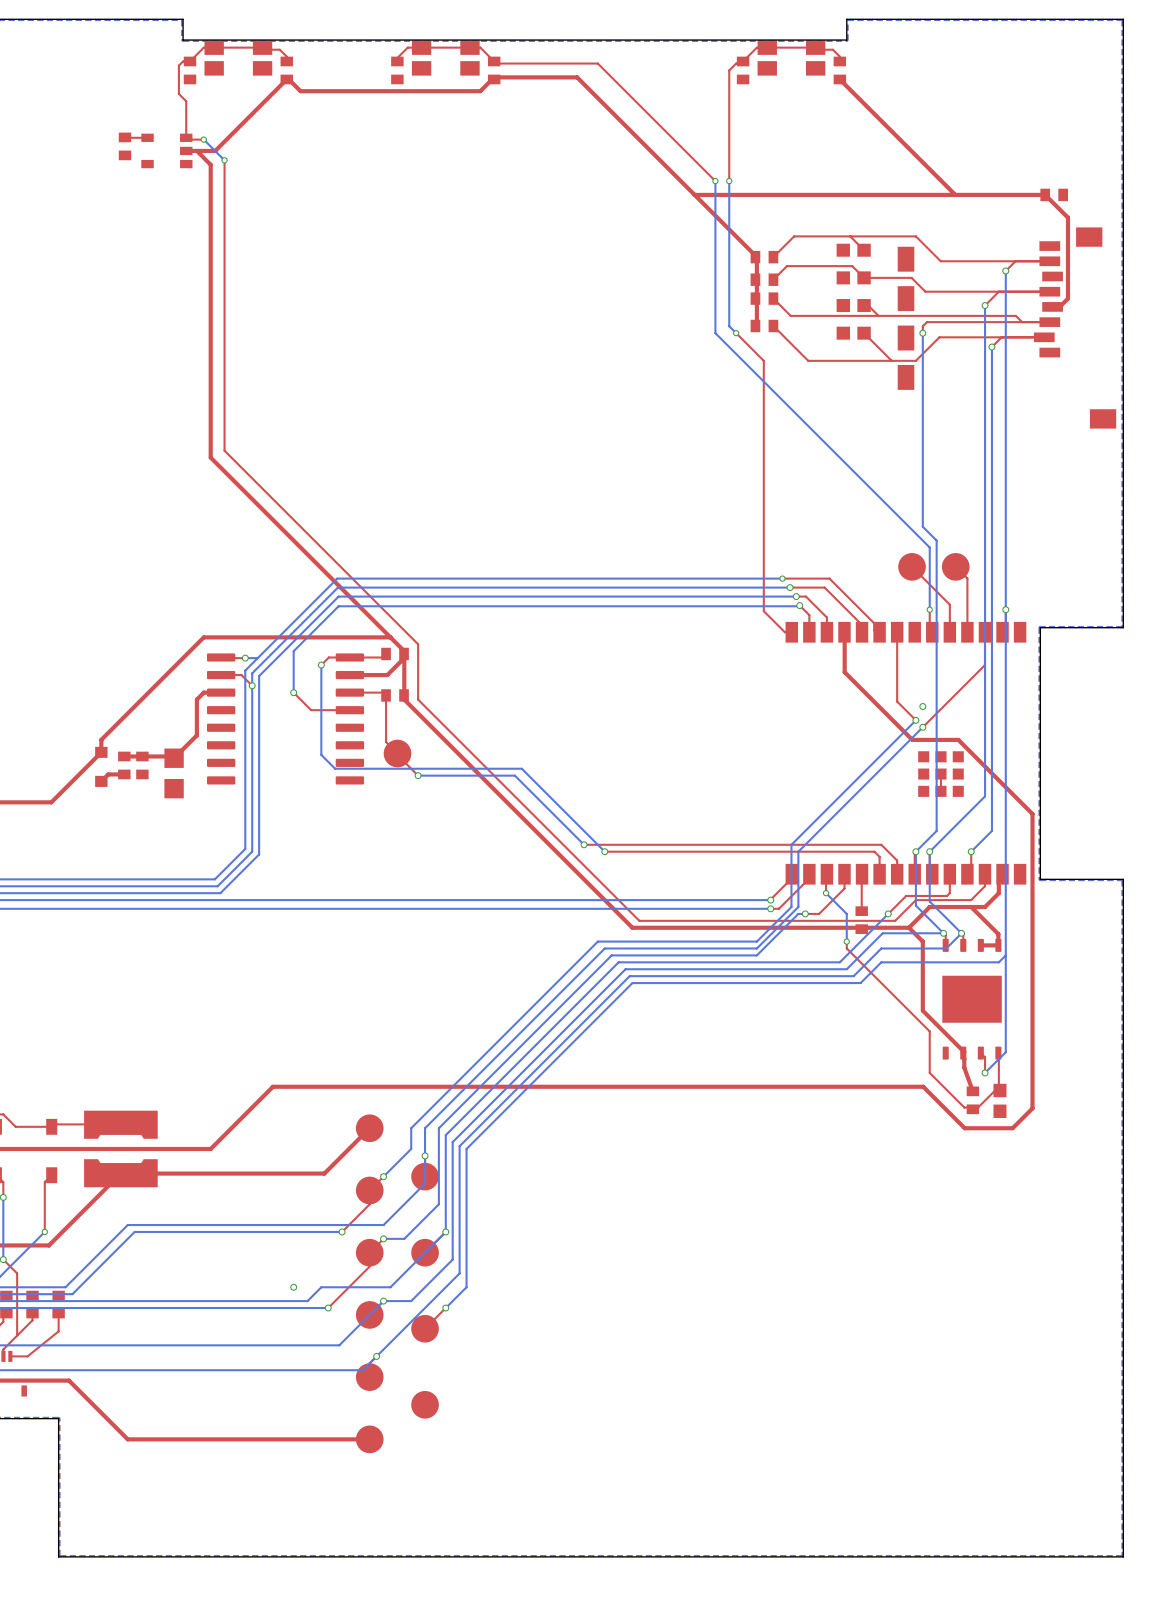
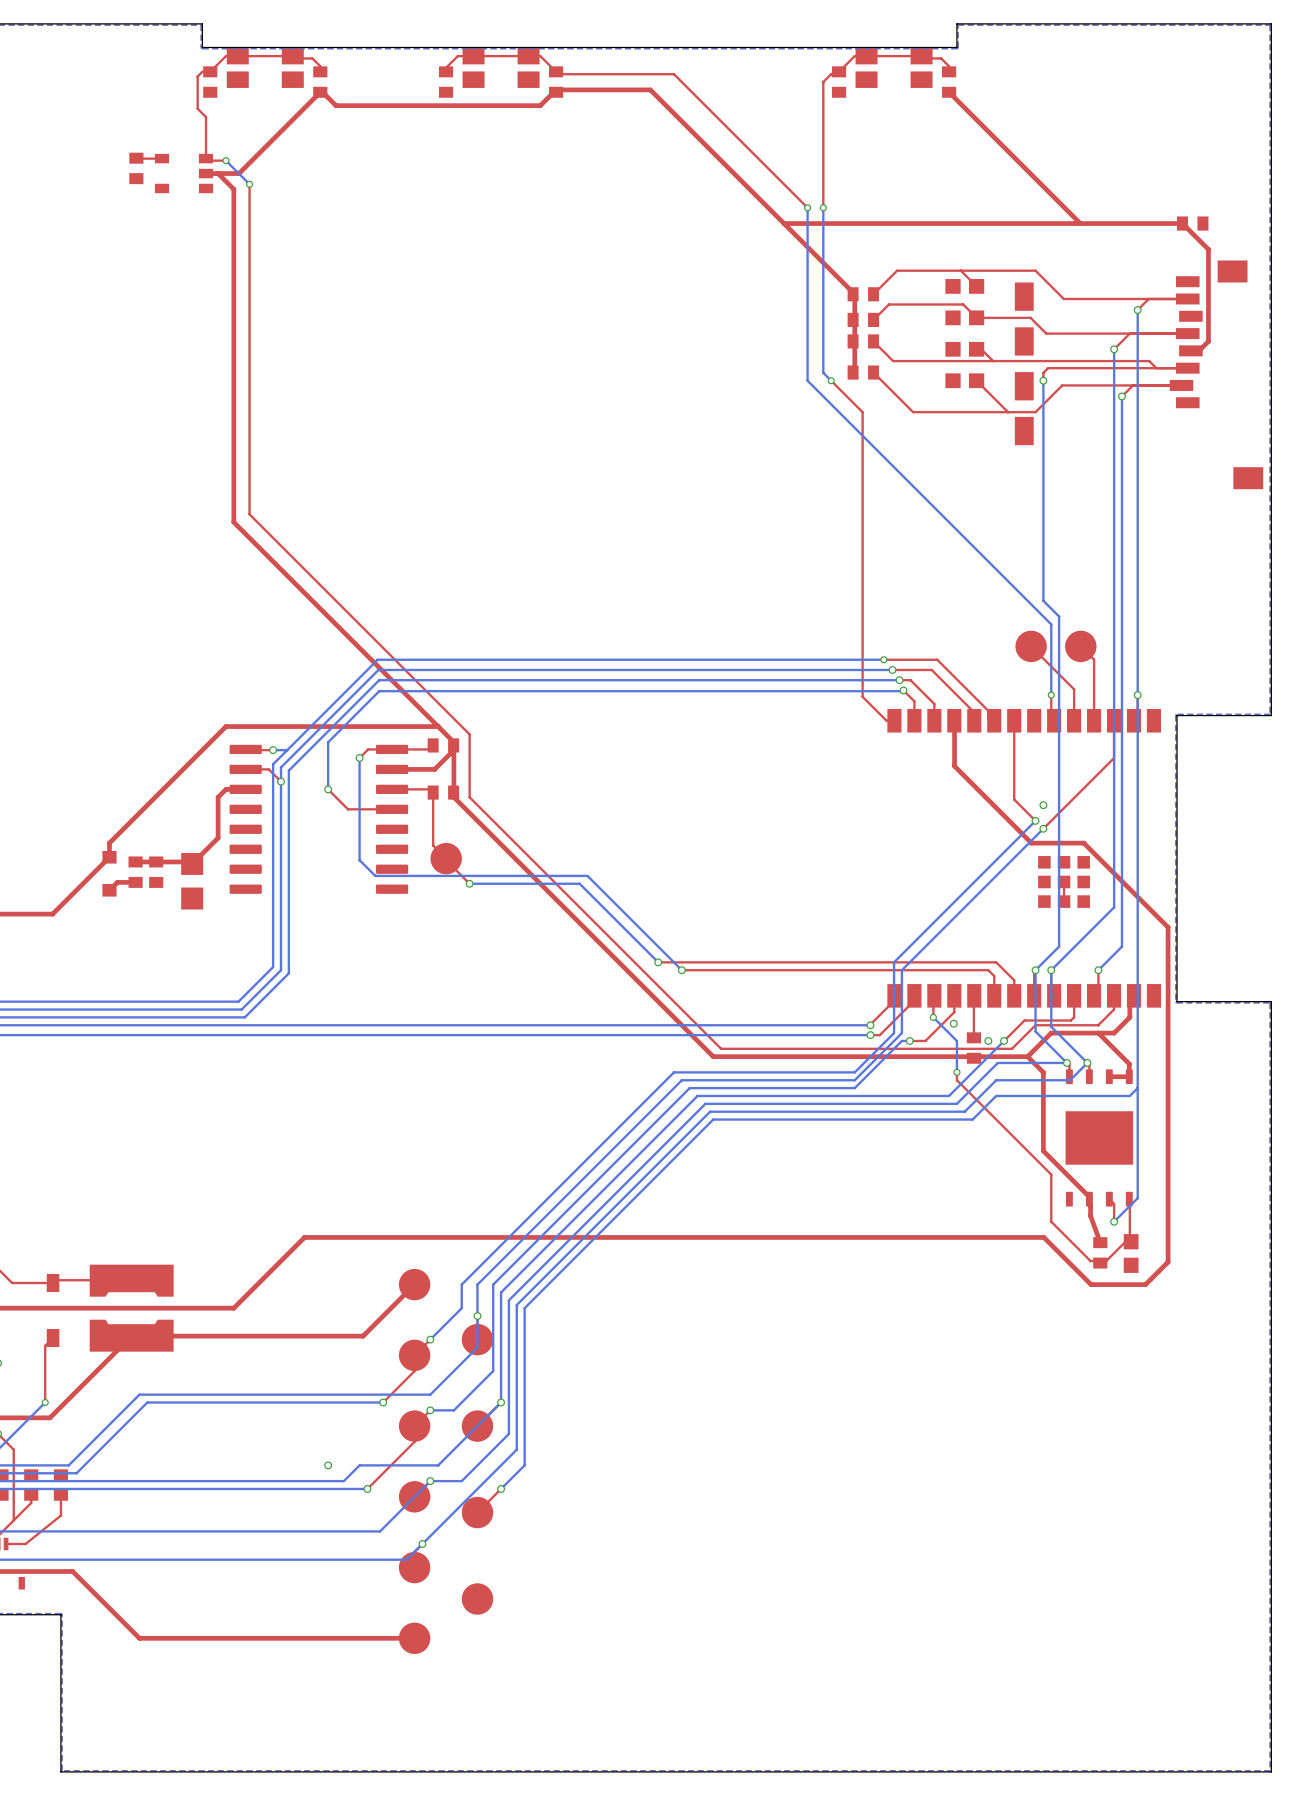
via: none -> (953, 1023)
via: none -> (988, 1040)

